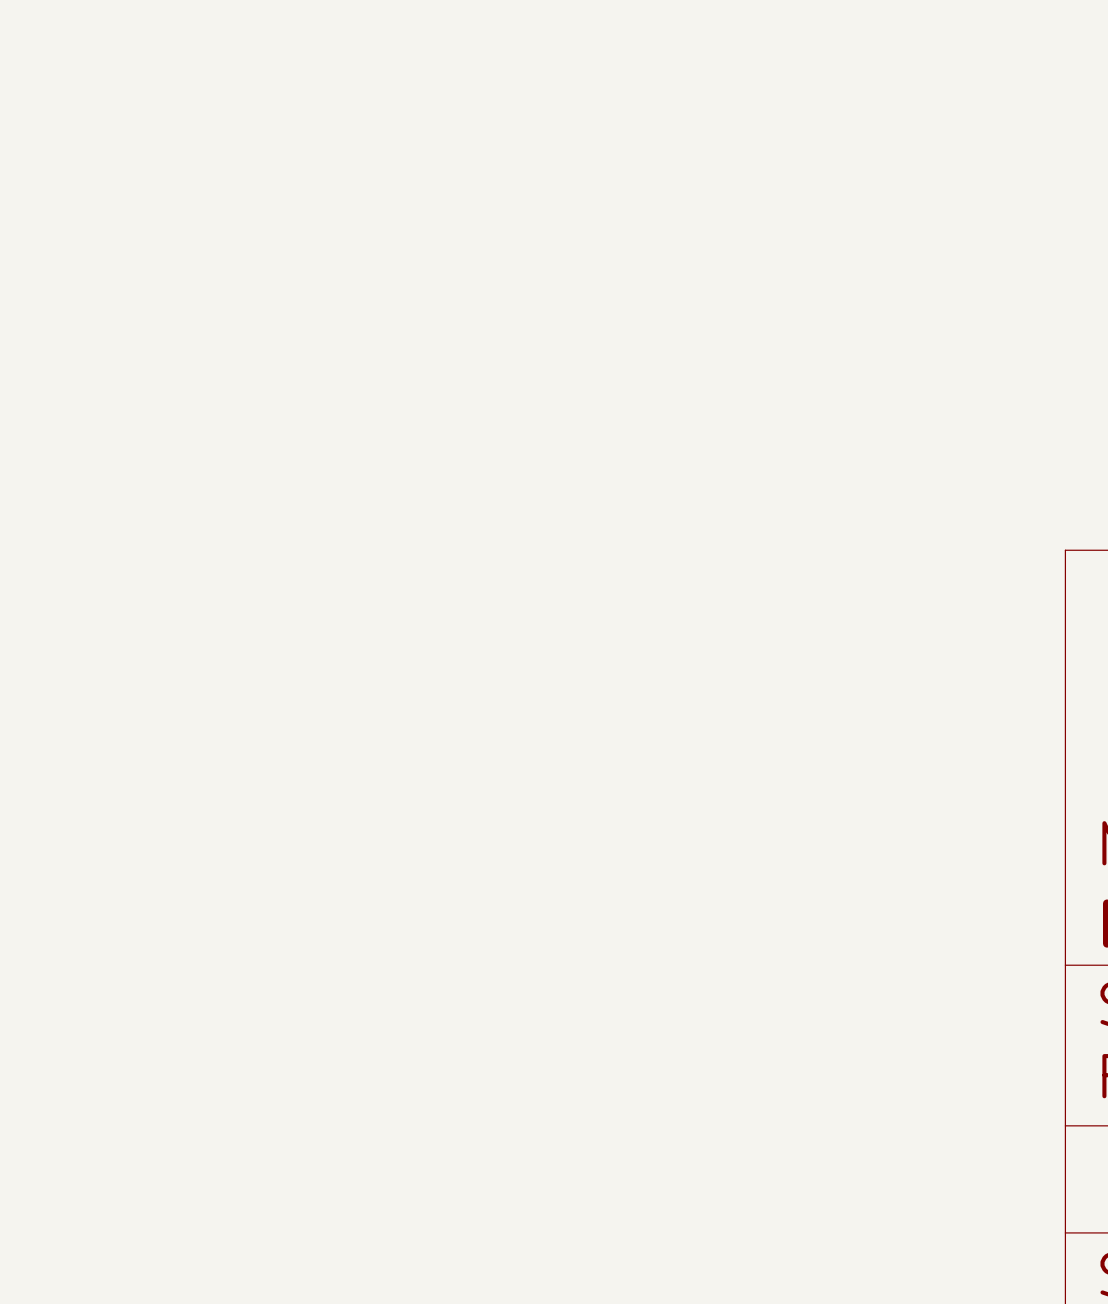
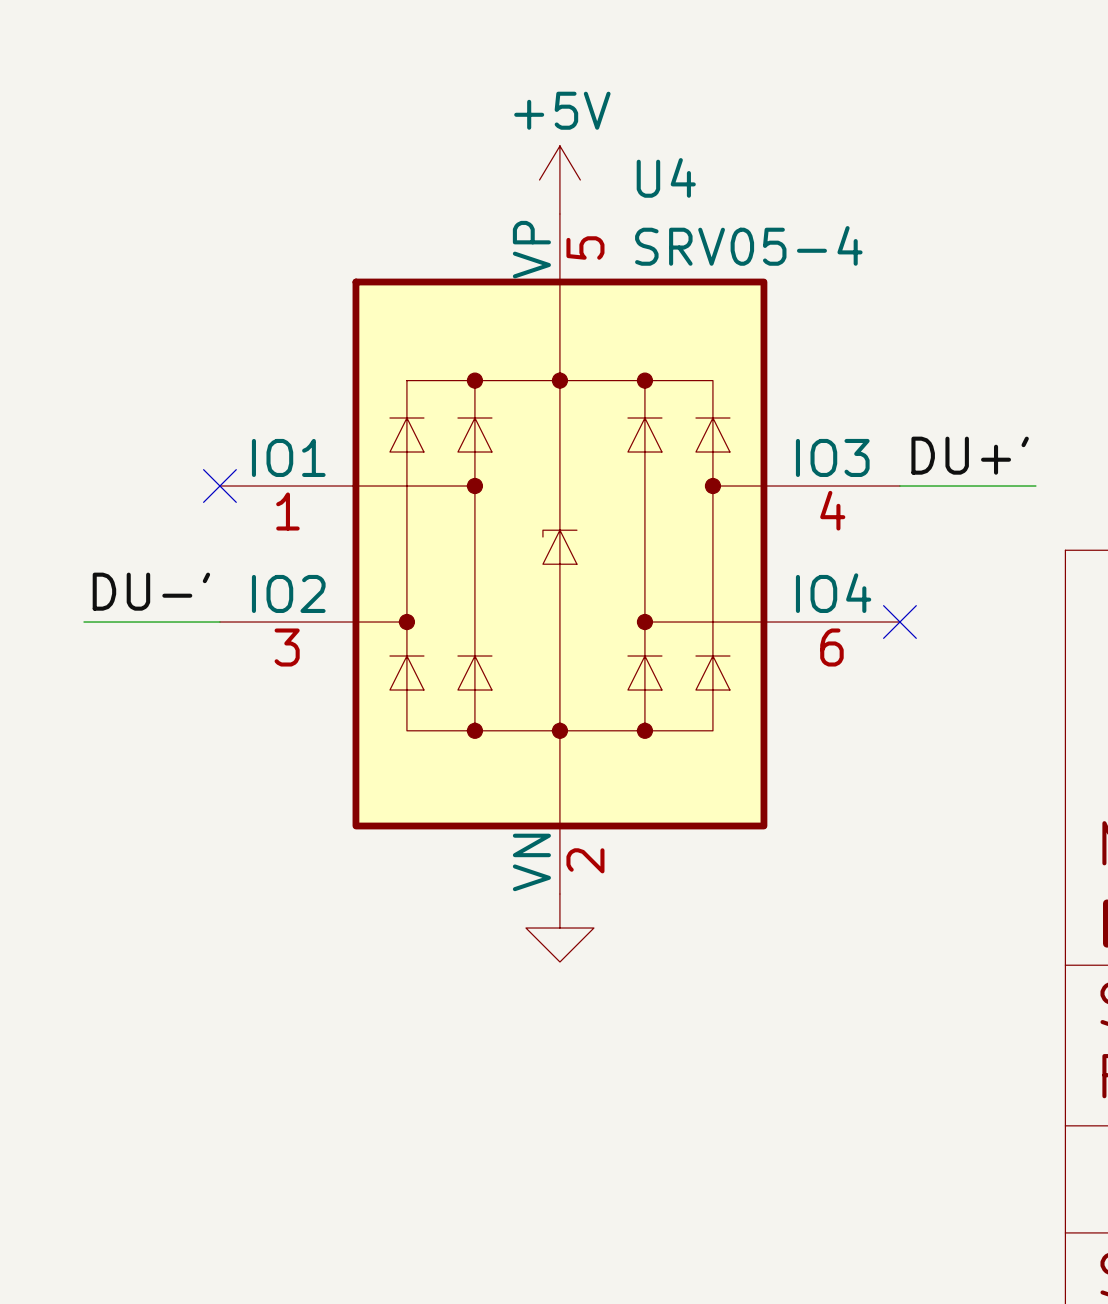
power symbol: none -> +5V (559, 180)
label: none -> DU+' (970, 455)
no-connect mark: none -> (219, 486)
wire: none -> (899, 486) (1035, 486)
U4: none -> SRV05-4 (559, 554)
label: none -> DU-' (151, 591)
wire: none -> (83, 622) (219, 622)
no-connect mark: none -> (899, 622)
power symbol: none -> (559, 928)

